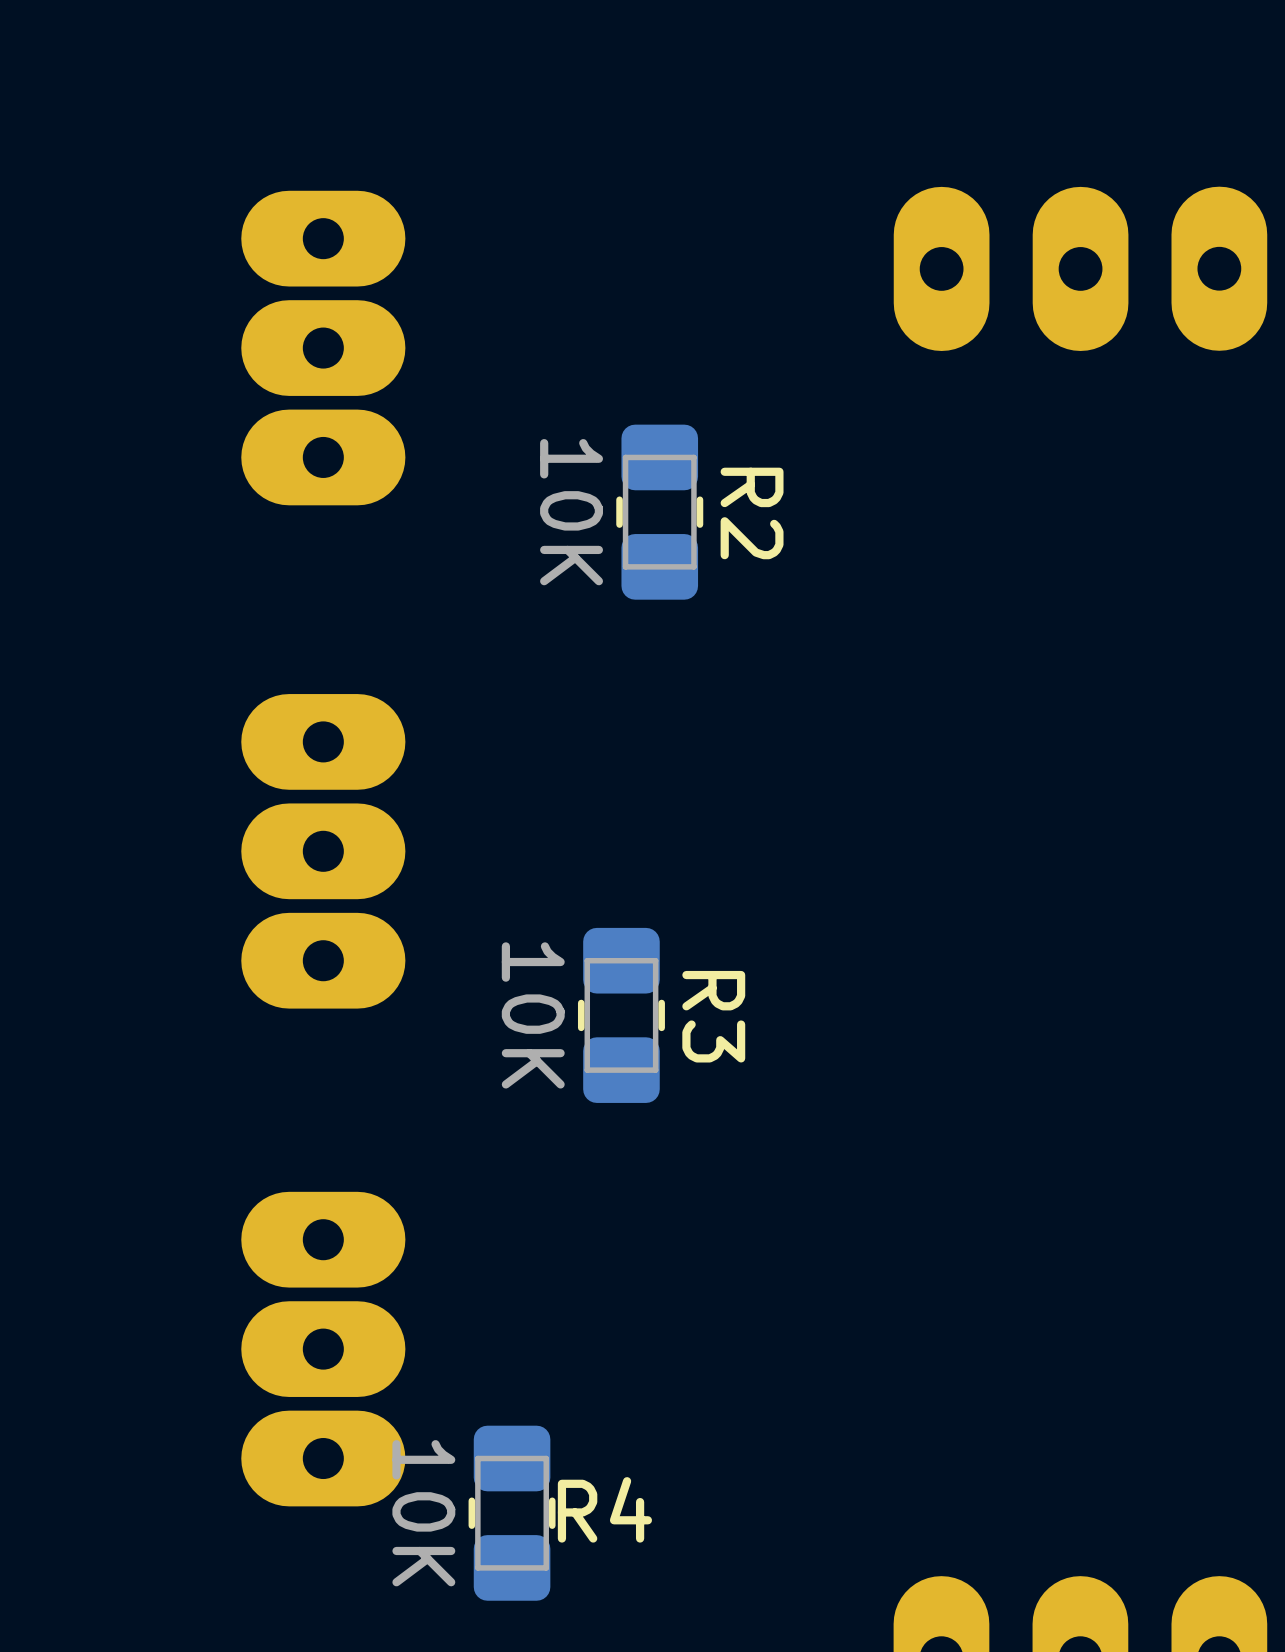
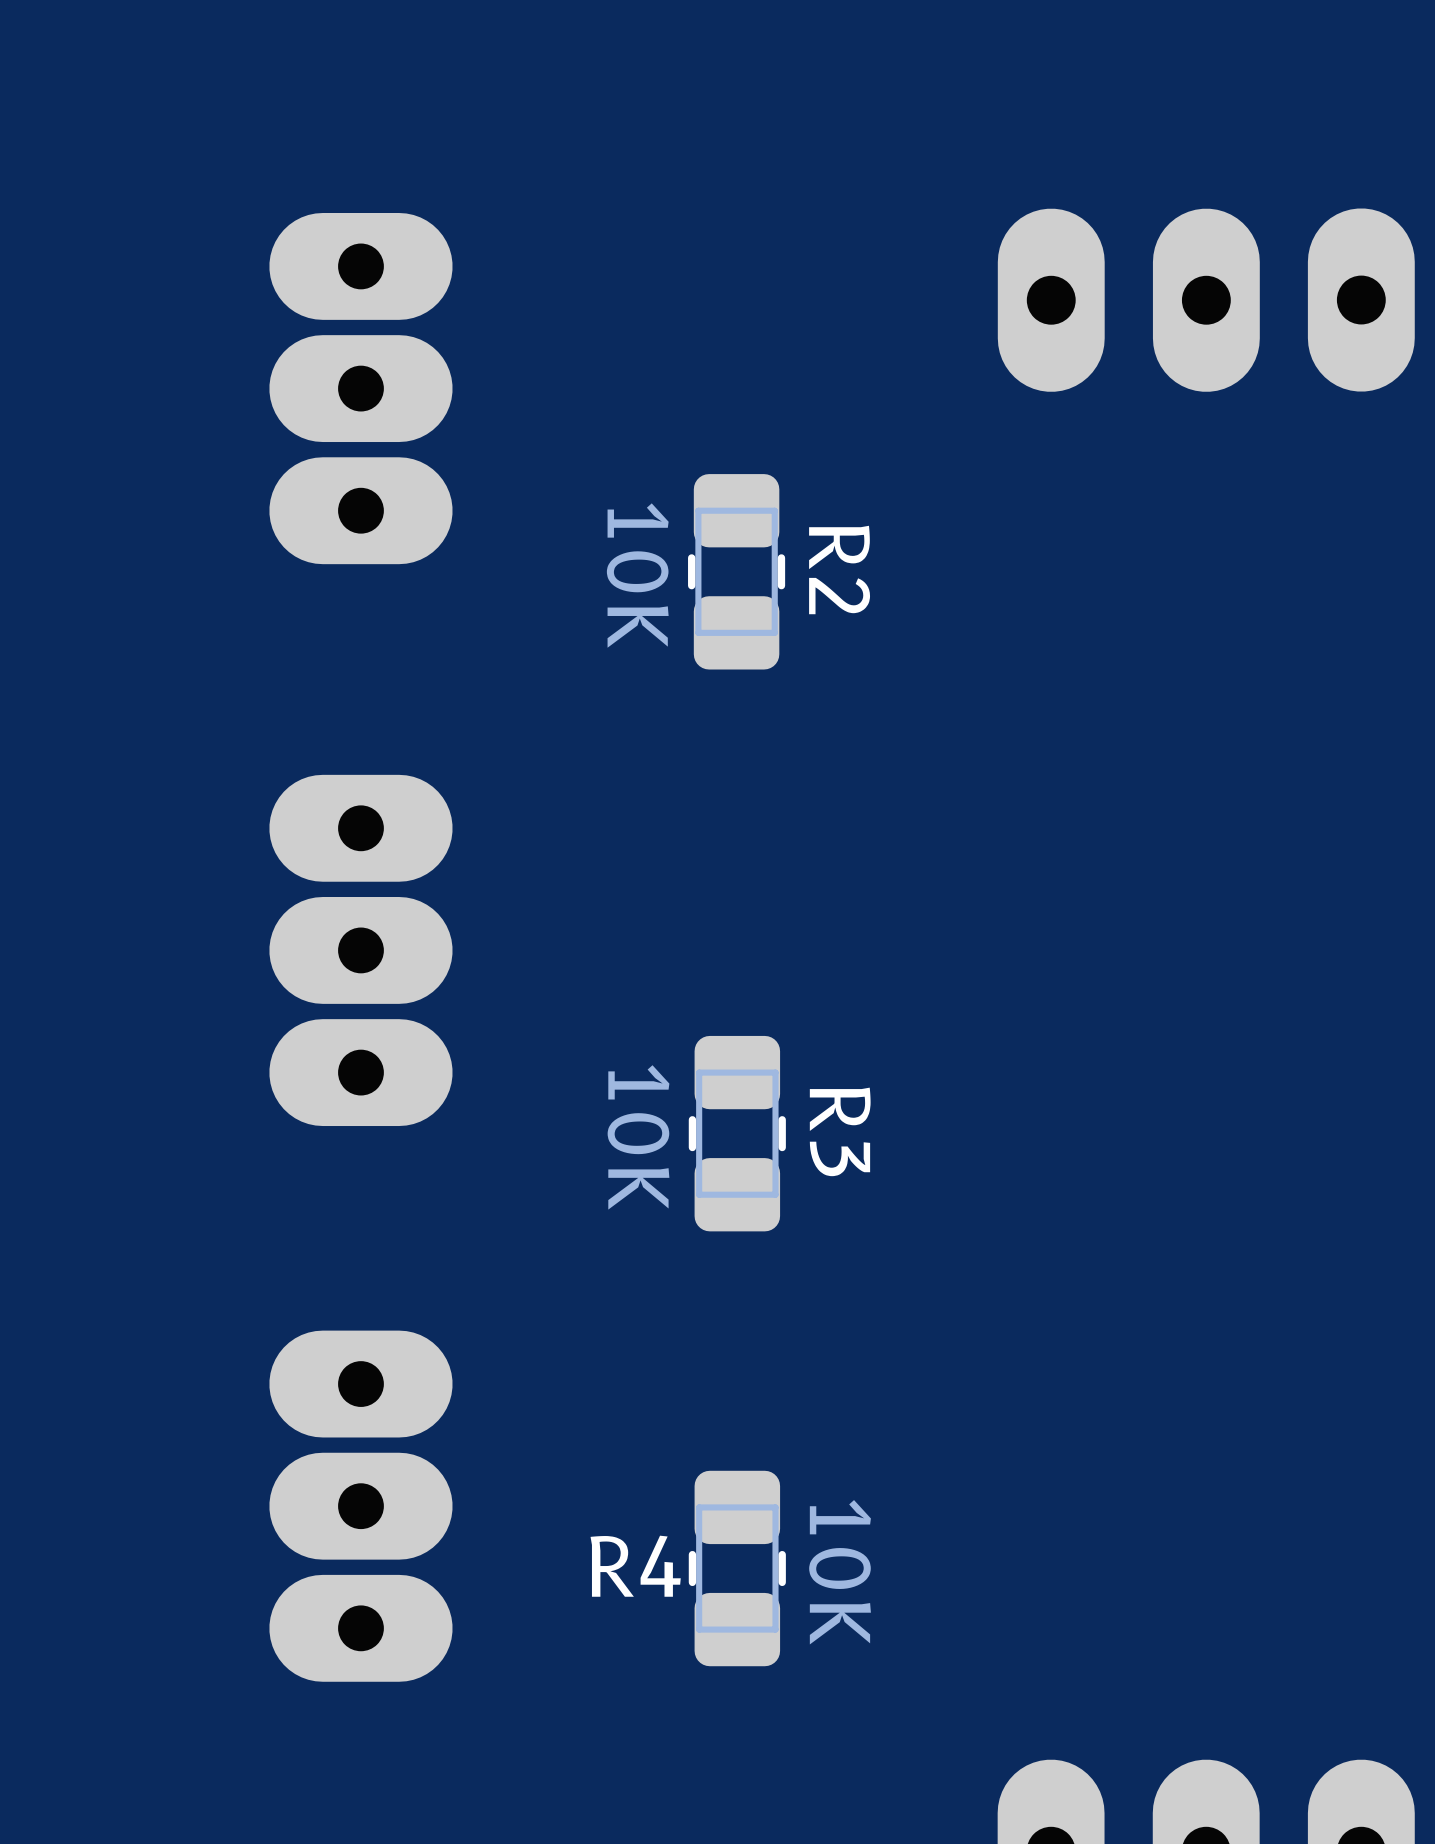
R3 position: (621, 1015) -> (737, 1133)
R4 name position: R4 (604, 1509) -> R4 (635, 1566)
R4 value position: 10K (423, 1513) -> 10K (840, 1572)
R4 position: (512, 1513) -> (737, 1568)

